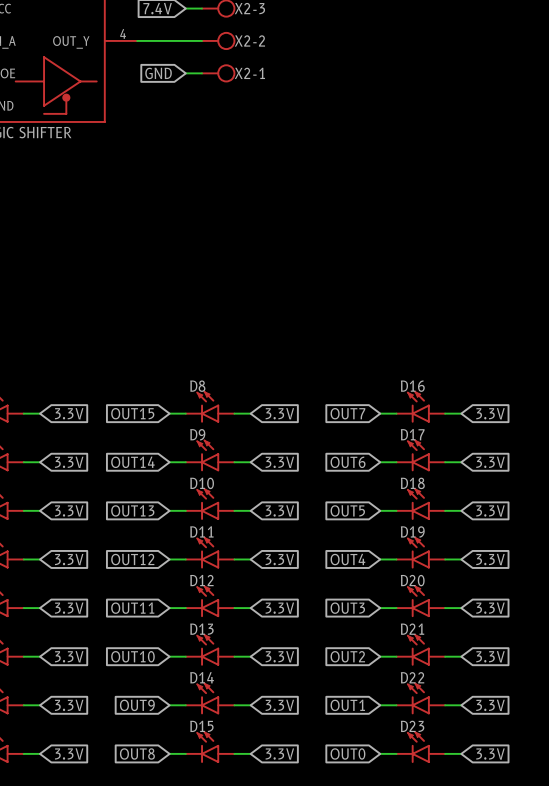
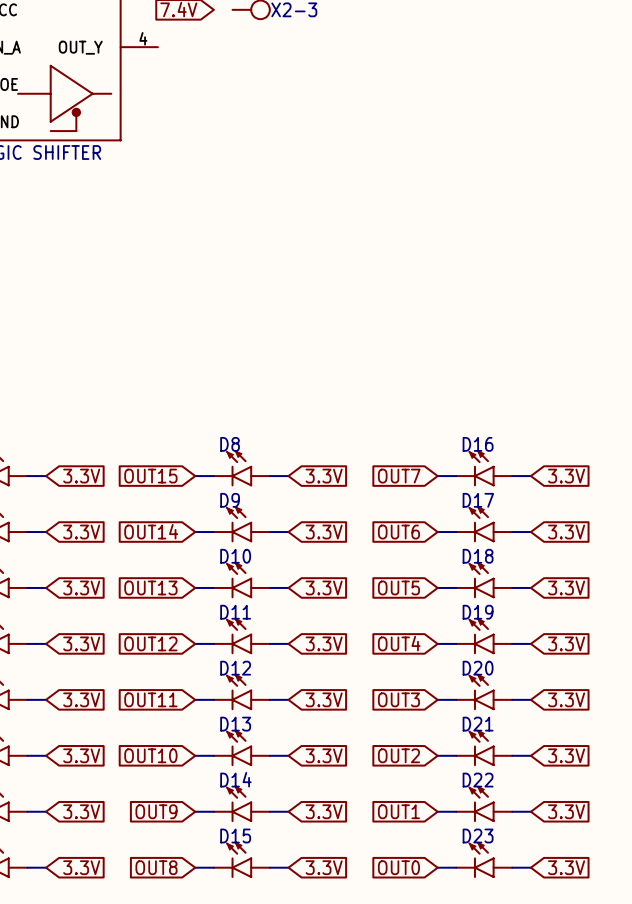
wire: (185, 8) (202, 8) -> none
wire: (137, 40) (202, 40) -> none
X2-2: (218, 40) -> none
global label: GND (158, 73) -> none
wire: (185, 73) (202, 73) -> none
X2-1: (218, 73) -> none

